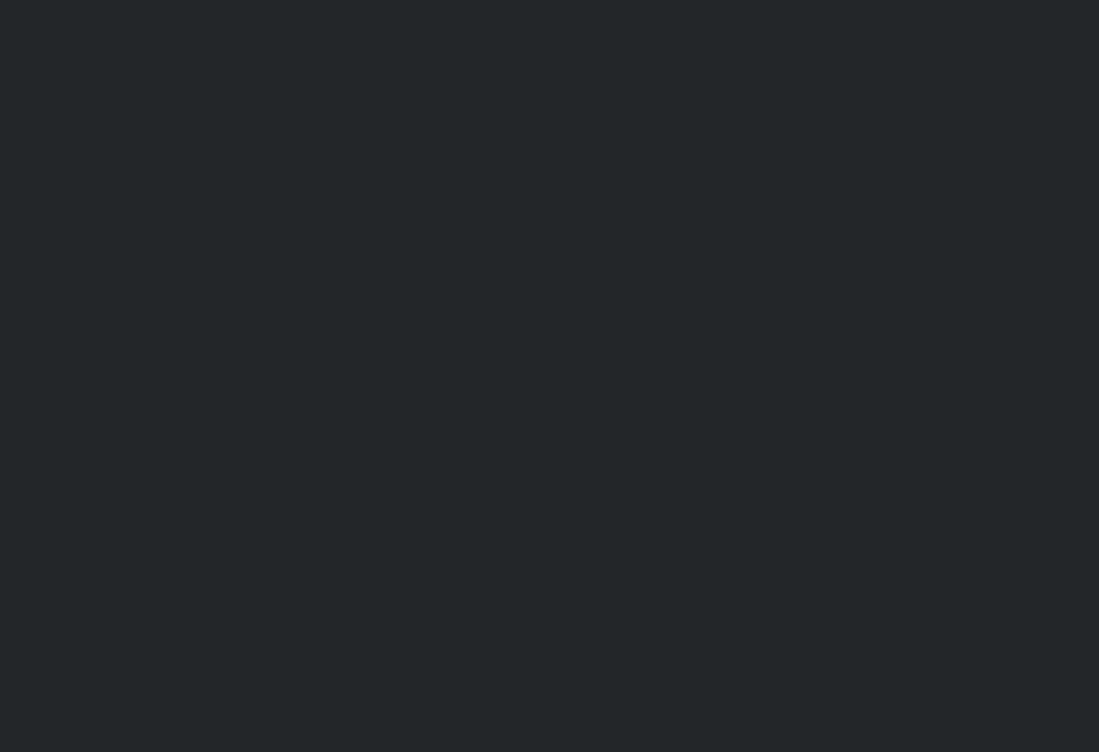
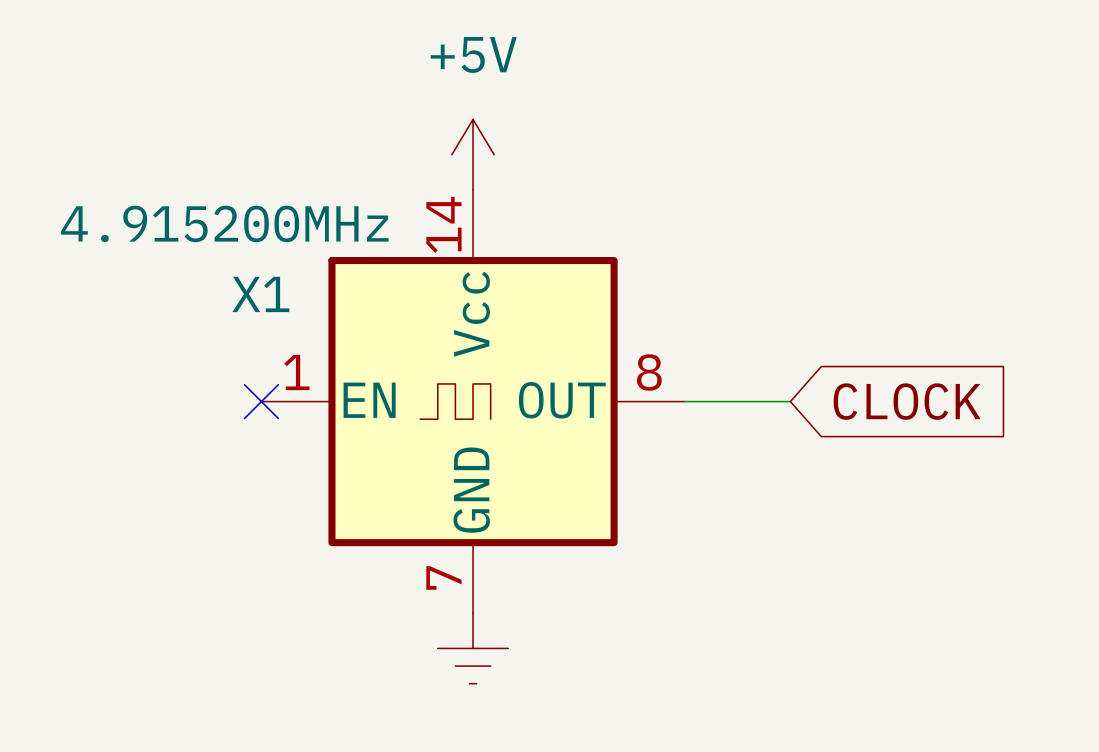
power symbol: none -> +5V (473, 154)
no-connect mark: none -> (261, 401)
X1: none -> 4.915200MHz (473, 401)
wire: none -> (684, 401) (790, 401)
global label: none -> CLOCK (907, 401)
power symbol: none -> (473, 648)

